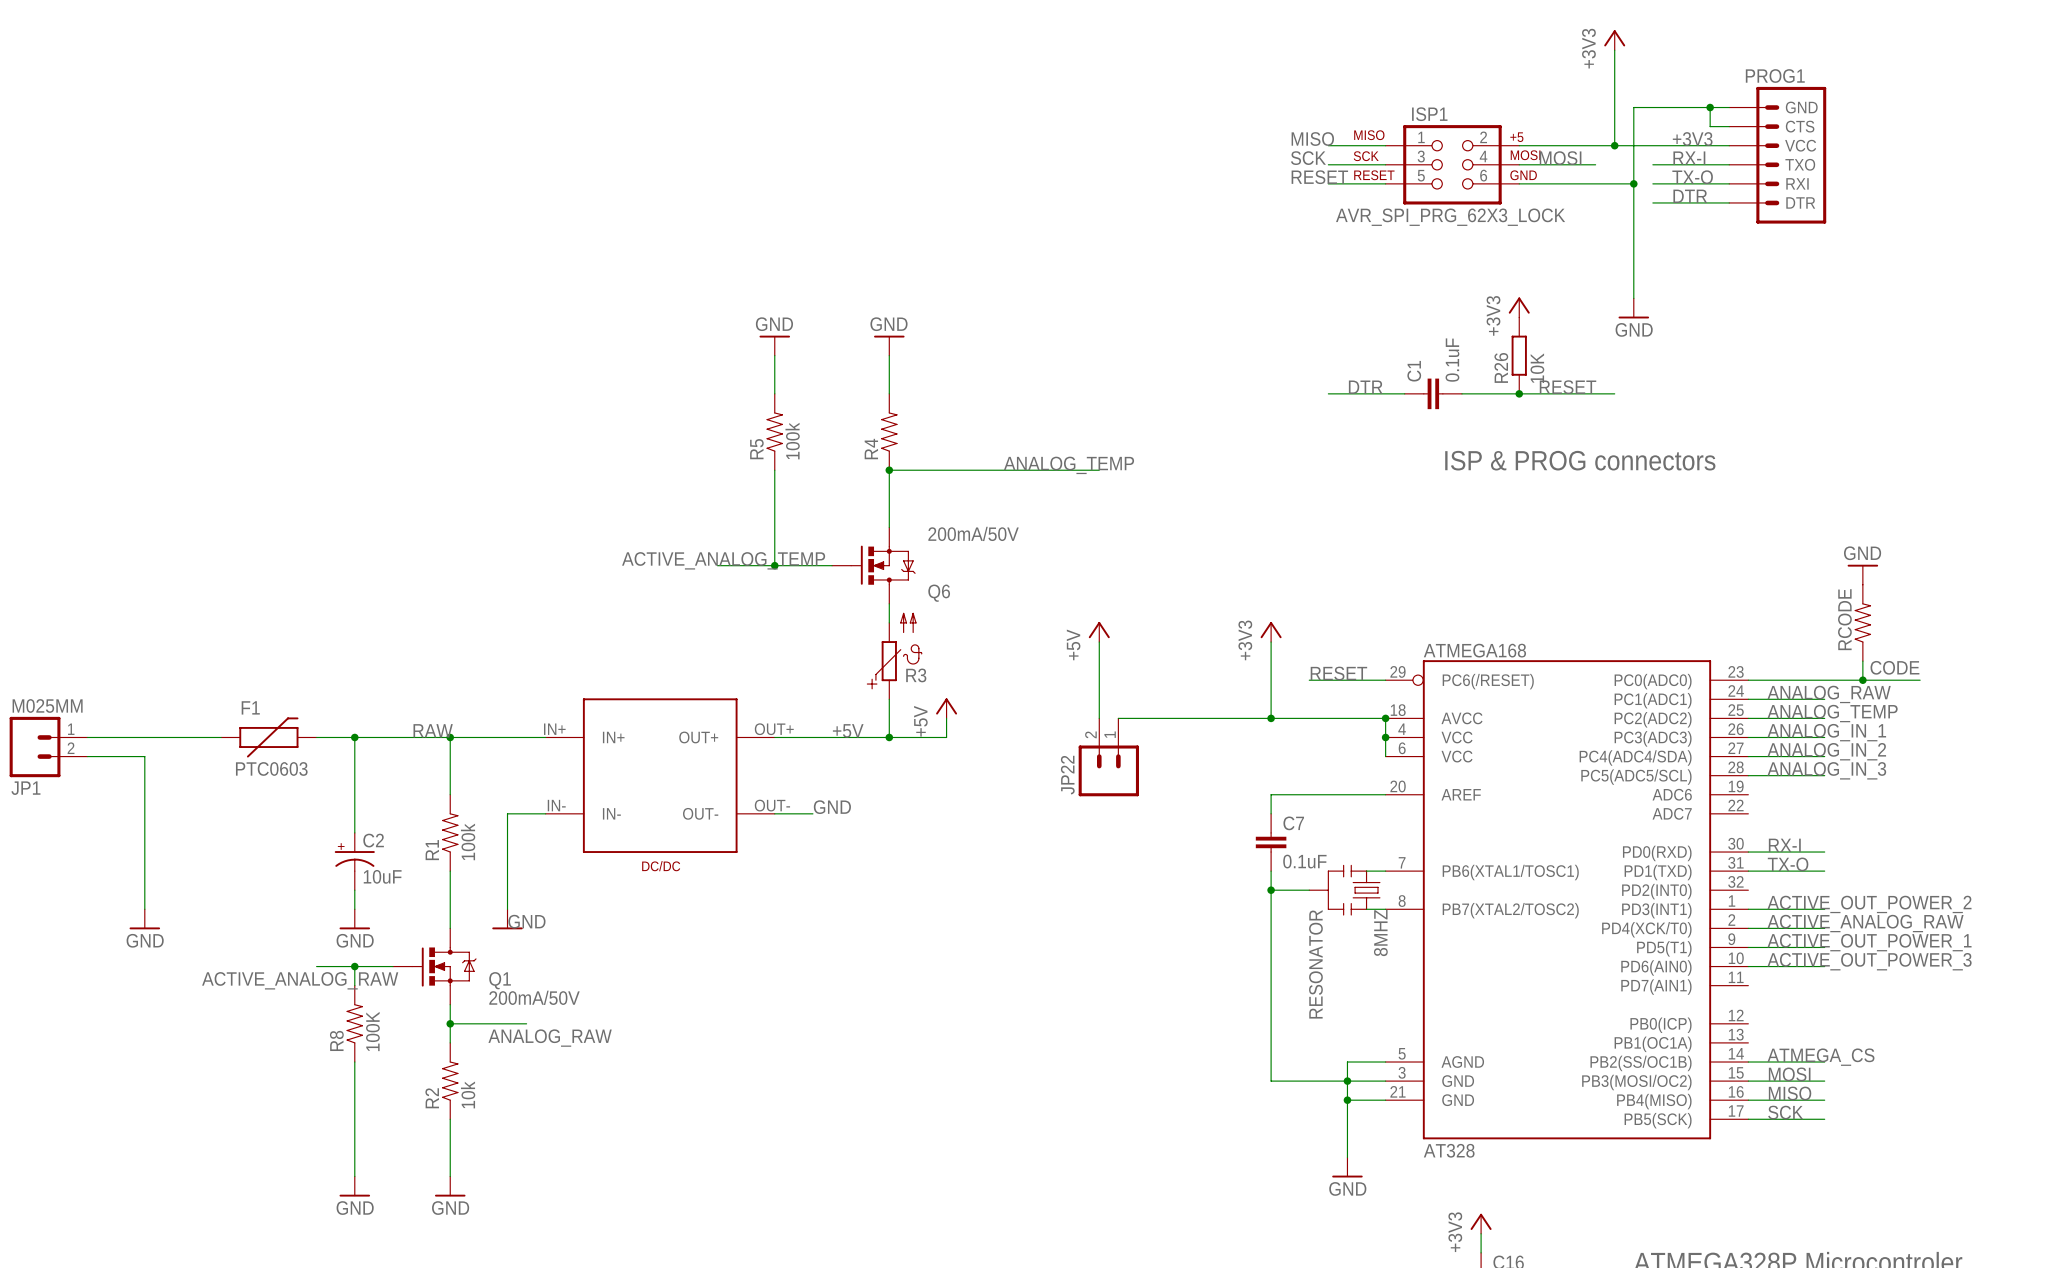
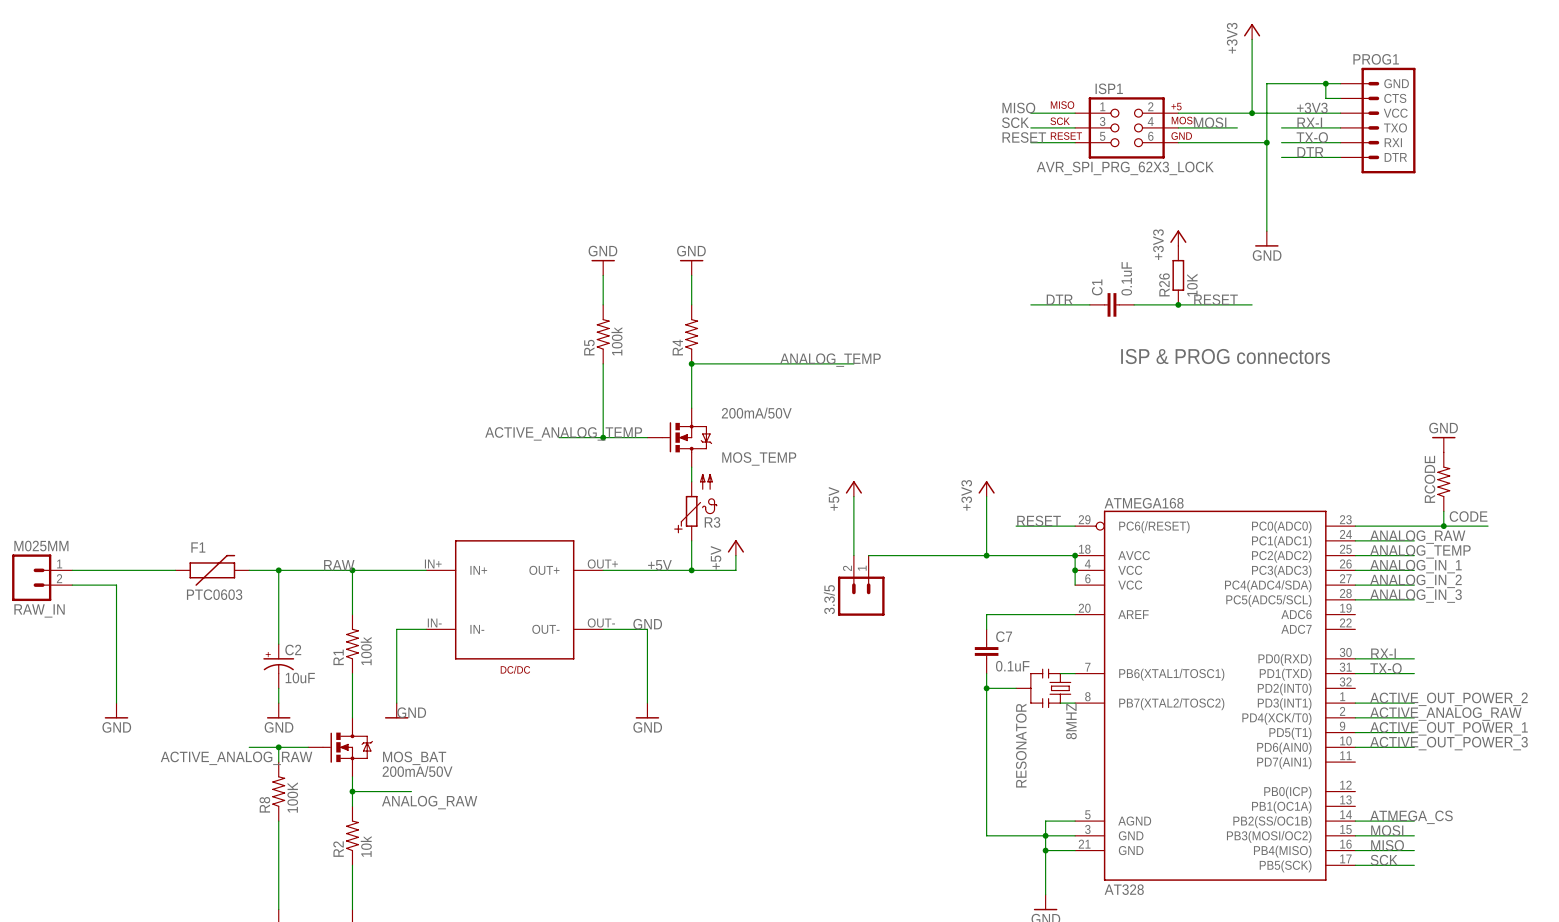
Q6 name: Q6 (939, 593) -> MOS_TEMP (759, 458)
JP22 name: JP22 (1067, 775) -> 3.3/5 (829, 599)
JP1 name: JP1 (25, 788) -> RAW_IN (39, 610)
wire: none -> (632, 629) (647, 629) (647, 703)
power symbol: none -> GND (647, 710)
Q1 name: Q1 (500, 980) -> MOS_BAT (414, 758)

